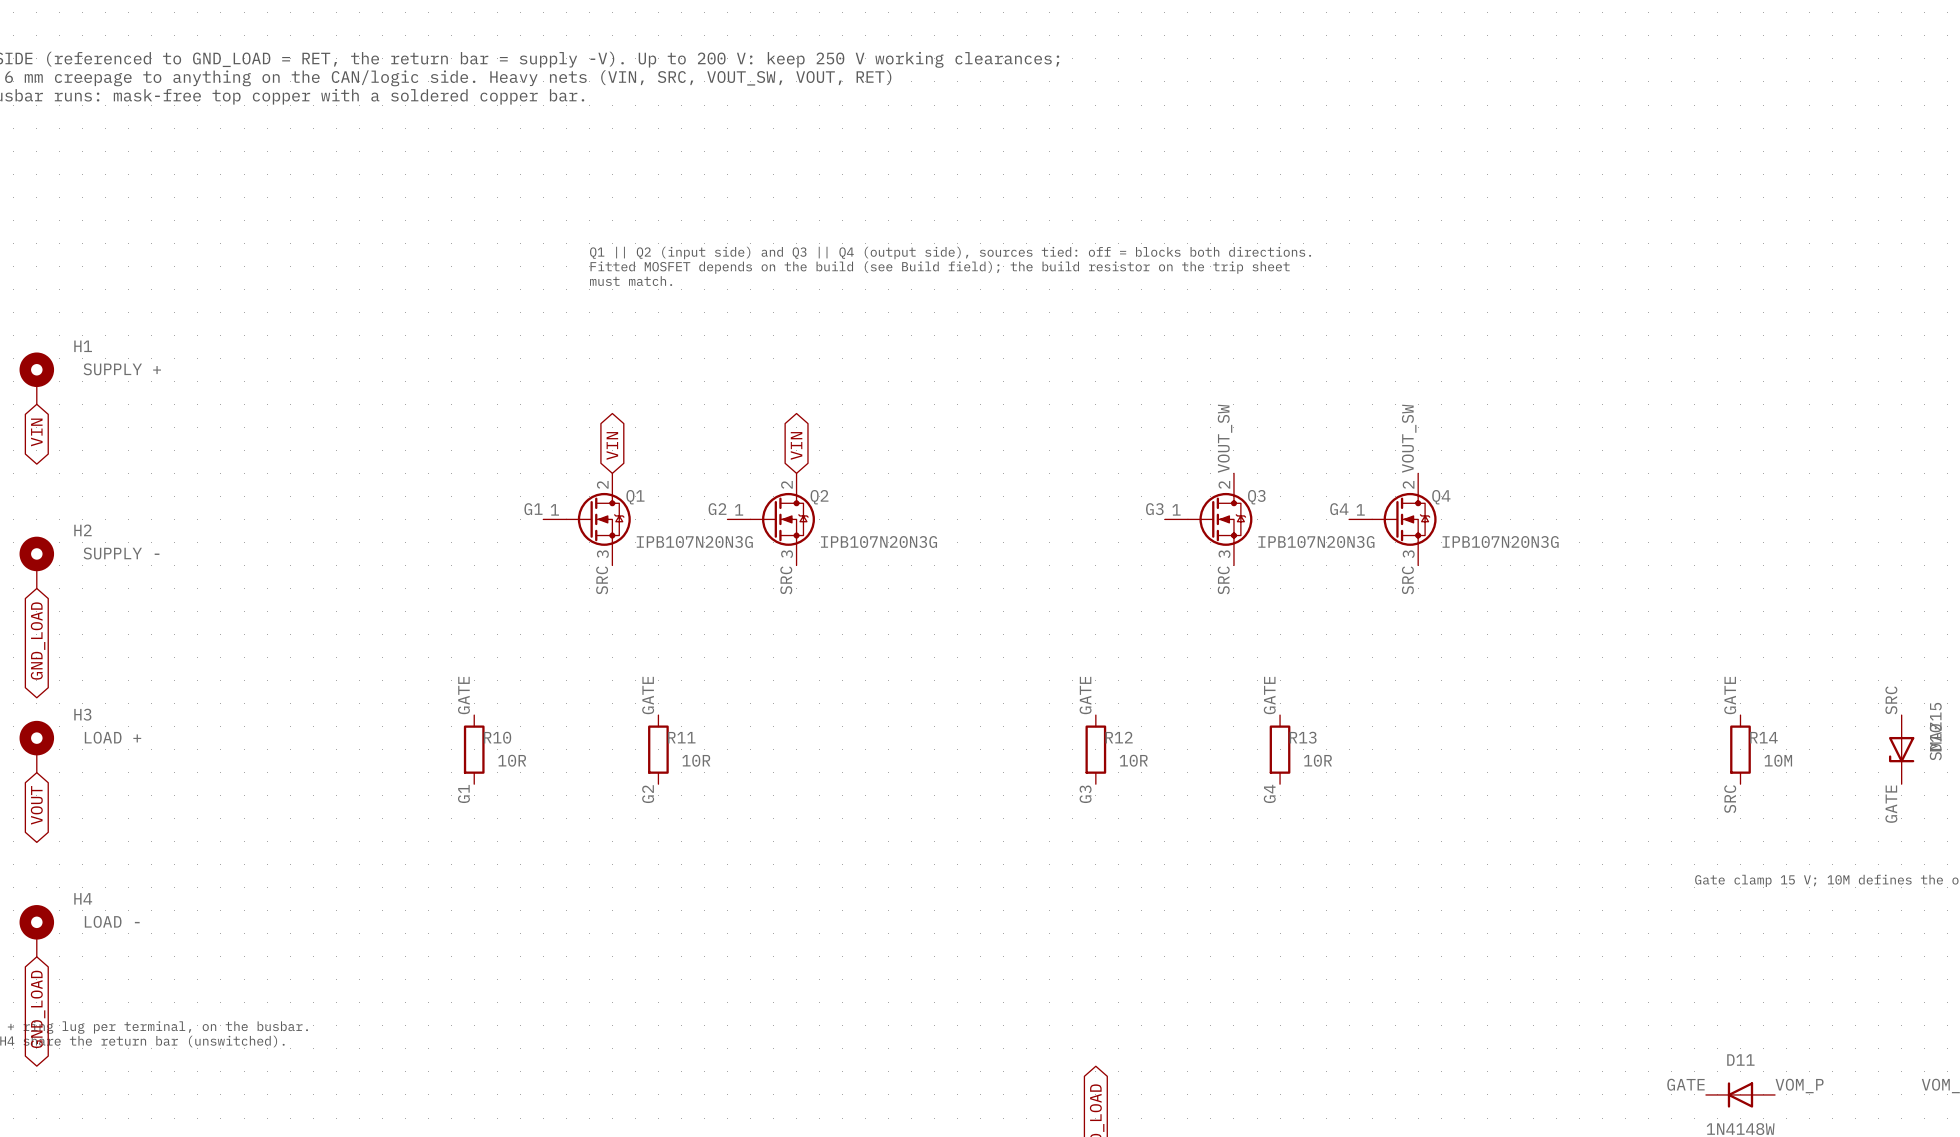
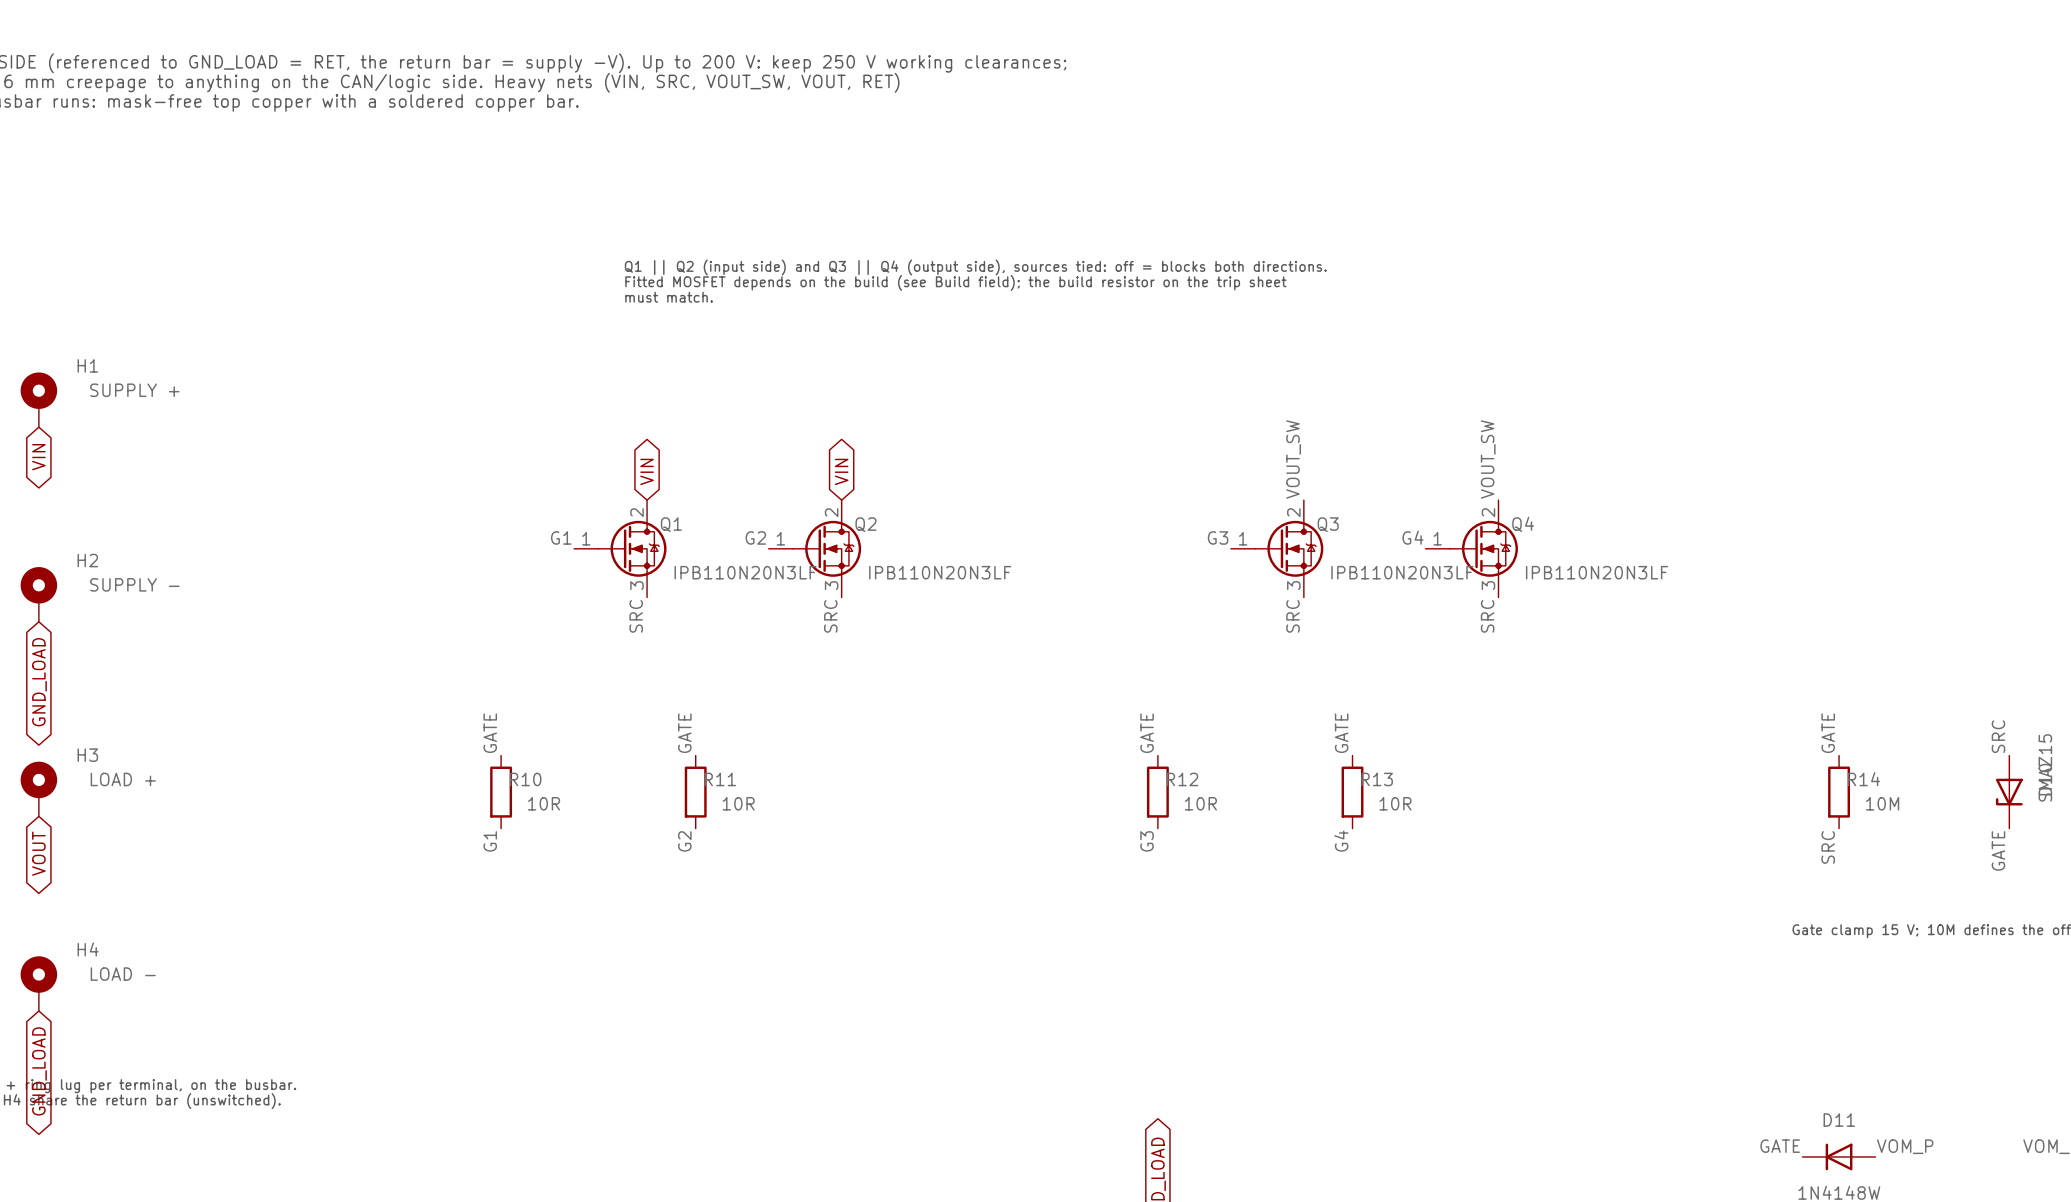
Q1 value: IPB107N20N3G (694, 542) -> IPB110N20N3LF (745, 572)
Q2 value: IPB107N20N3G (879, 542) -> IPB110N20N3LF (940, 572)
Q3 value: IPB107N20N3G (1316, 542) -> IPB110N20N3LF (1402, 572)
Q4 value: IPB107N20N3G (1500, 542) -> IPB110N20N3LF (1597, 572)

